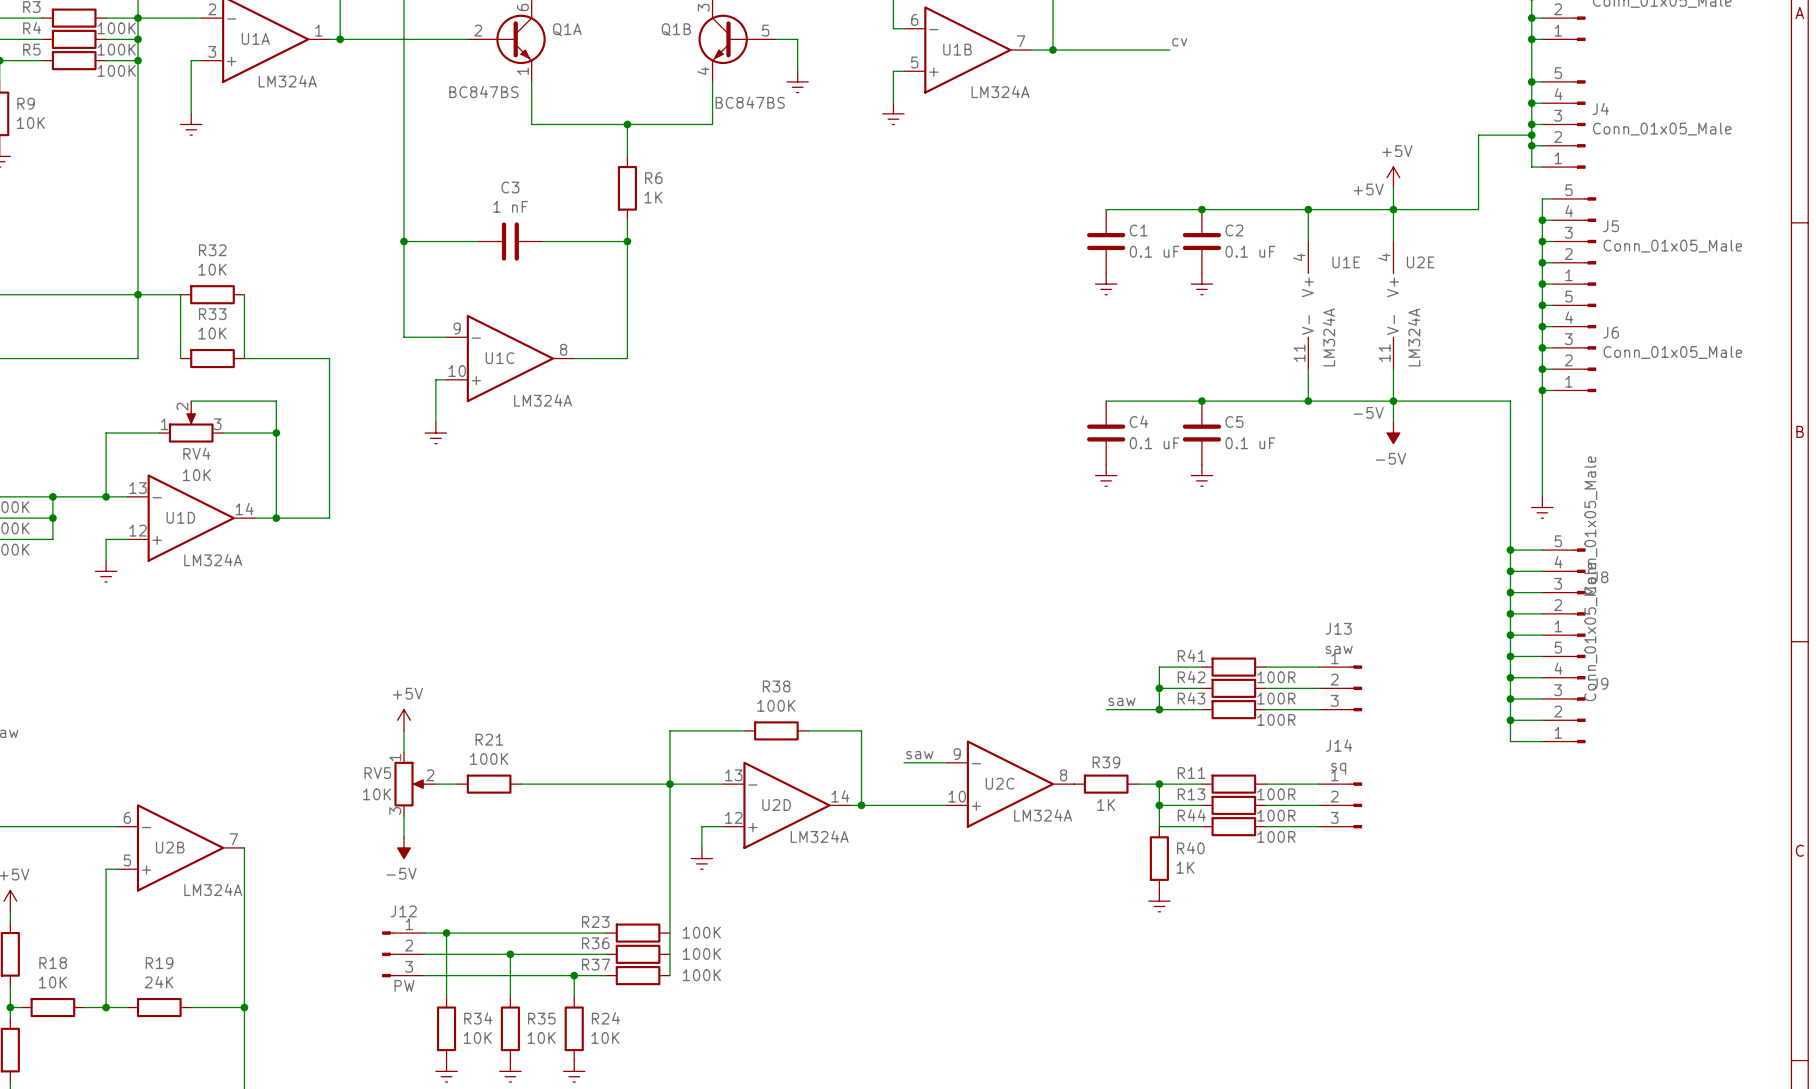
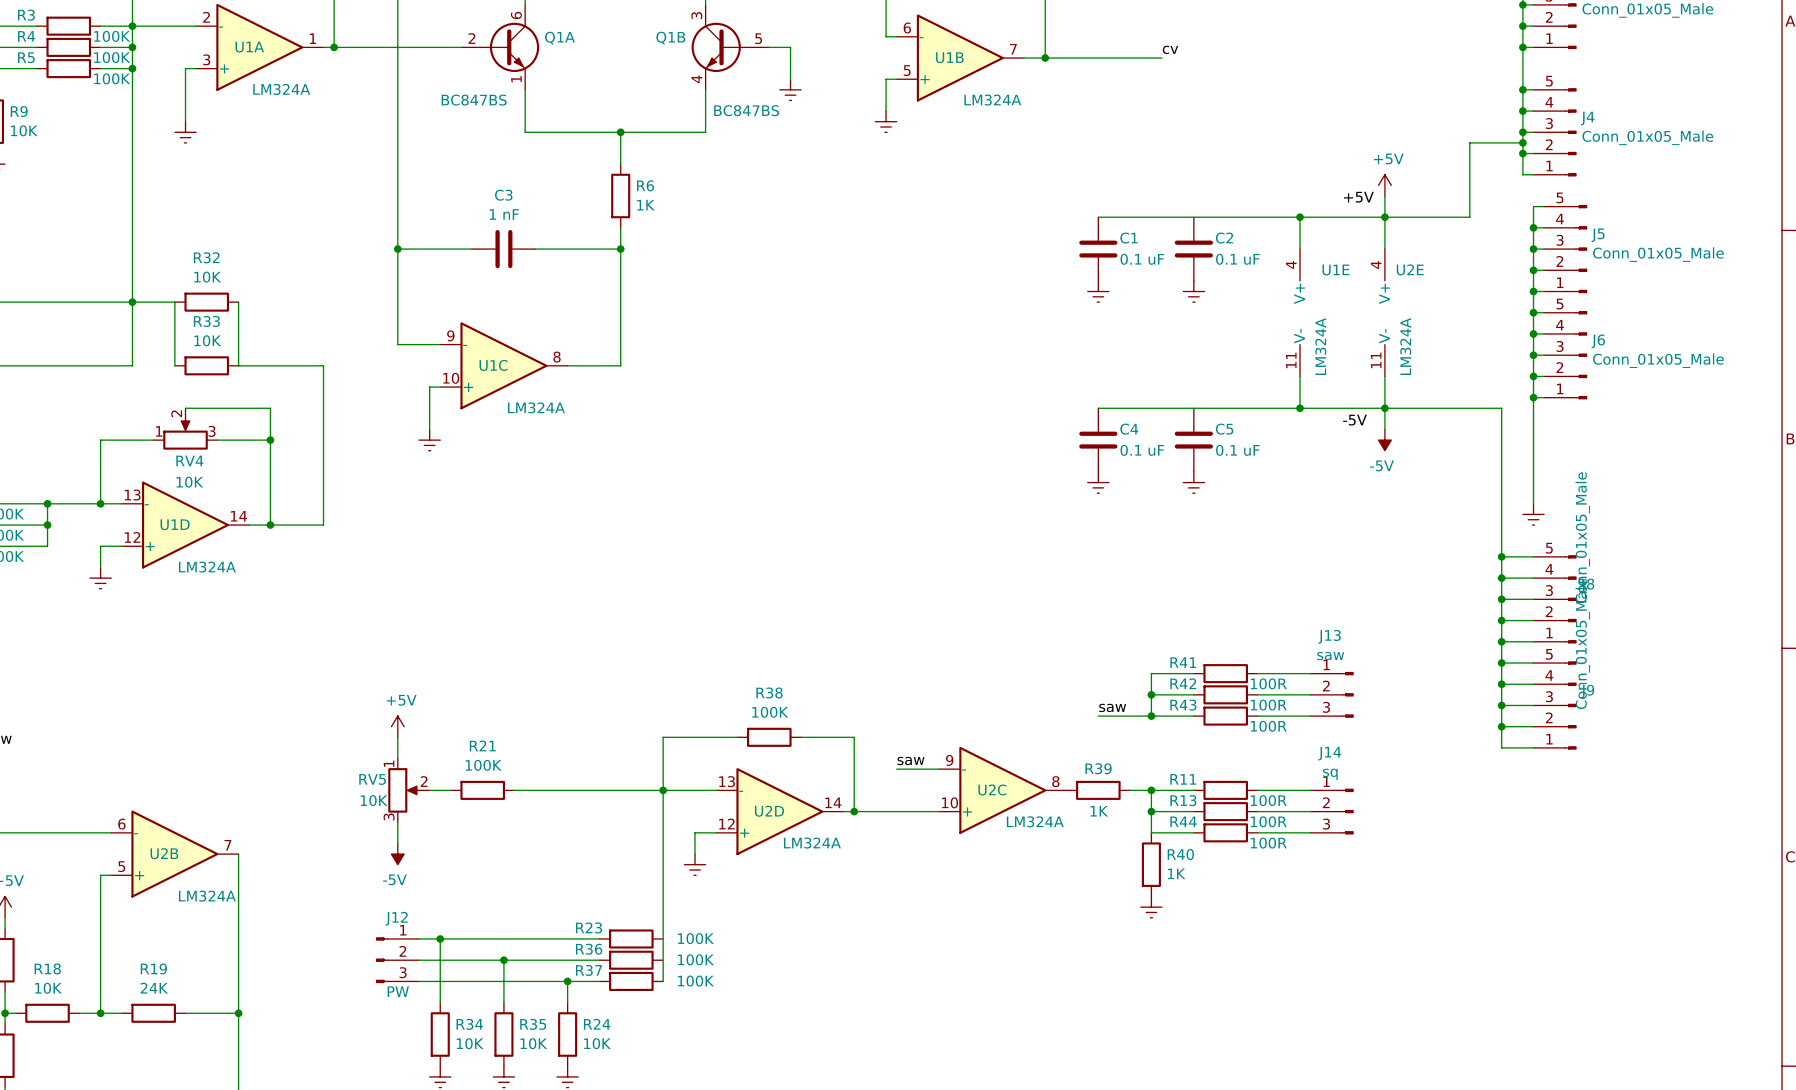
junction: (1201, 209) -> none
junction: (1201, 401) -> none

